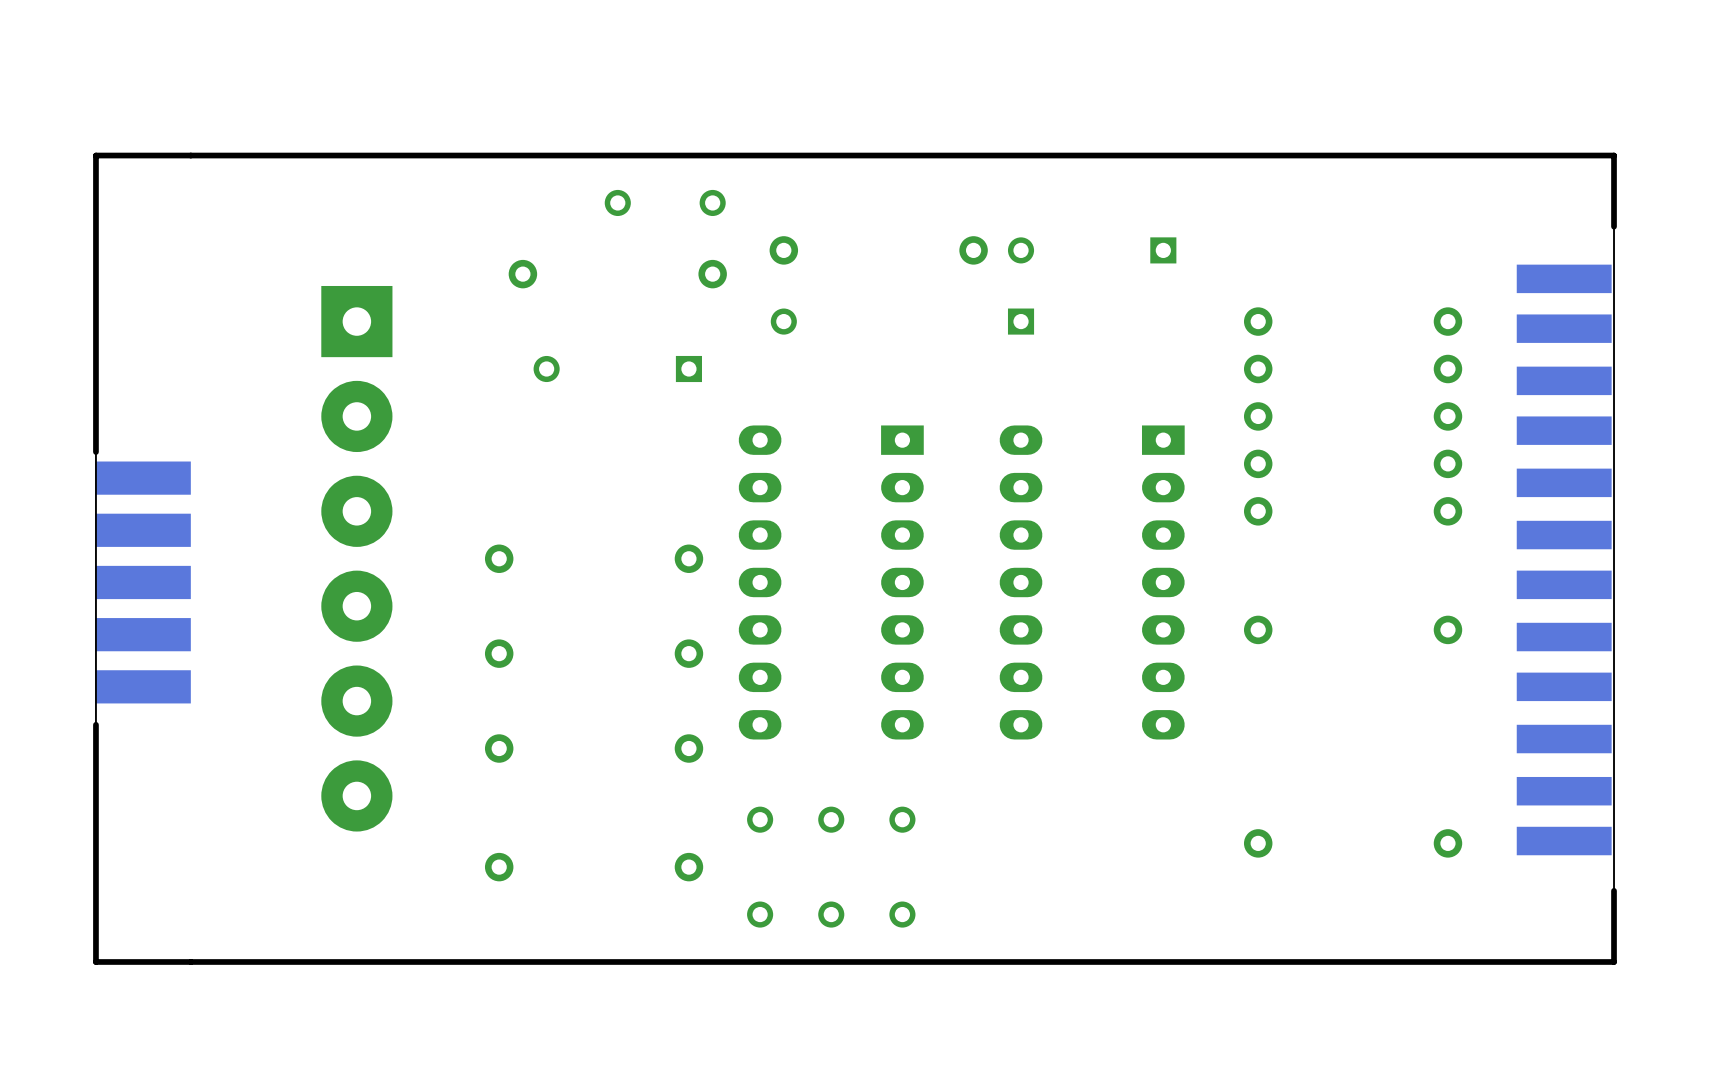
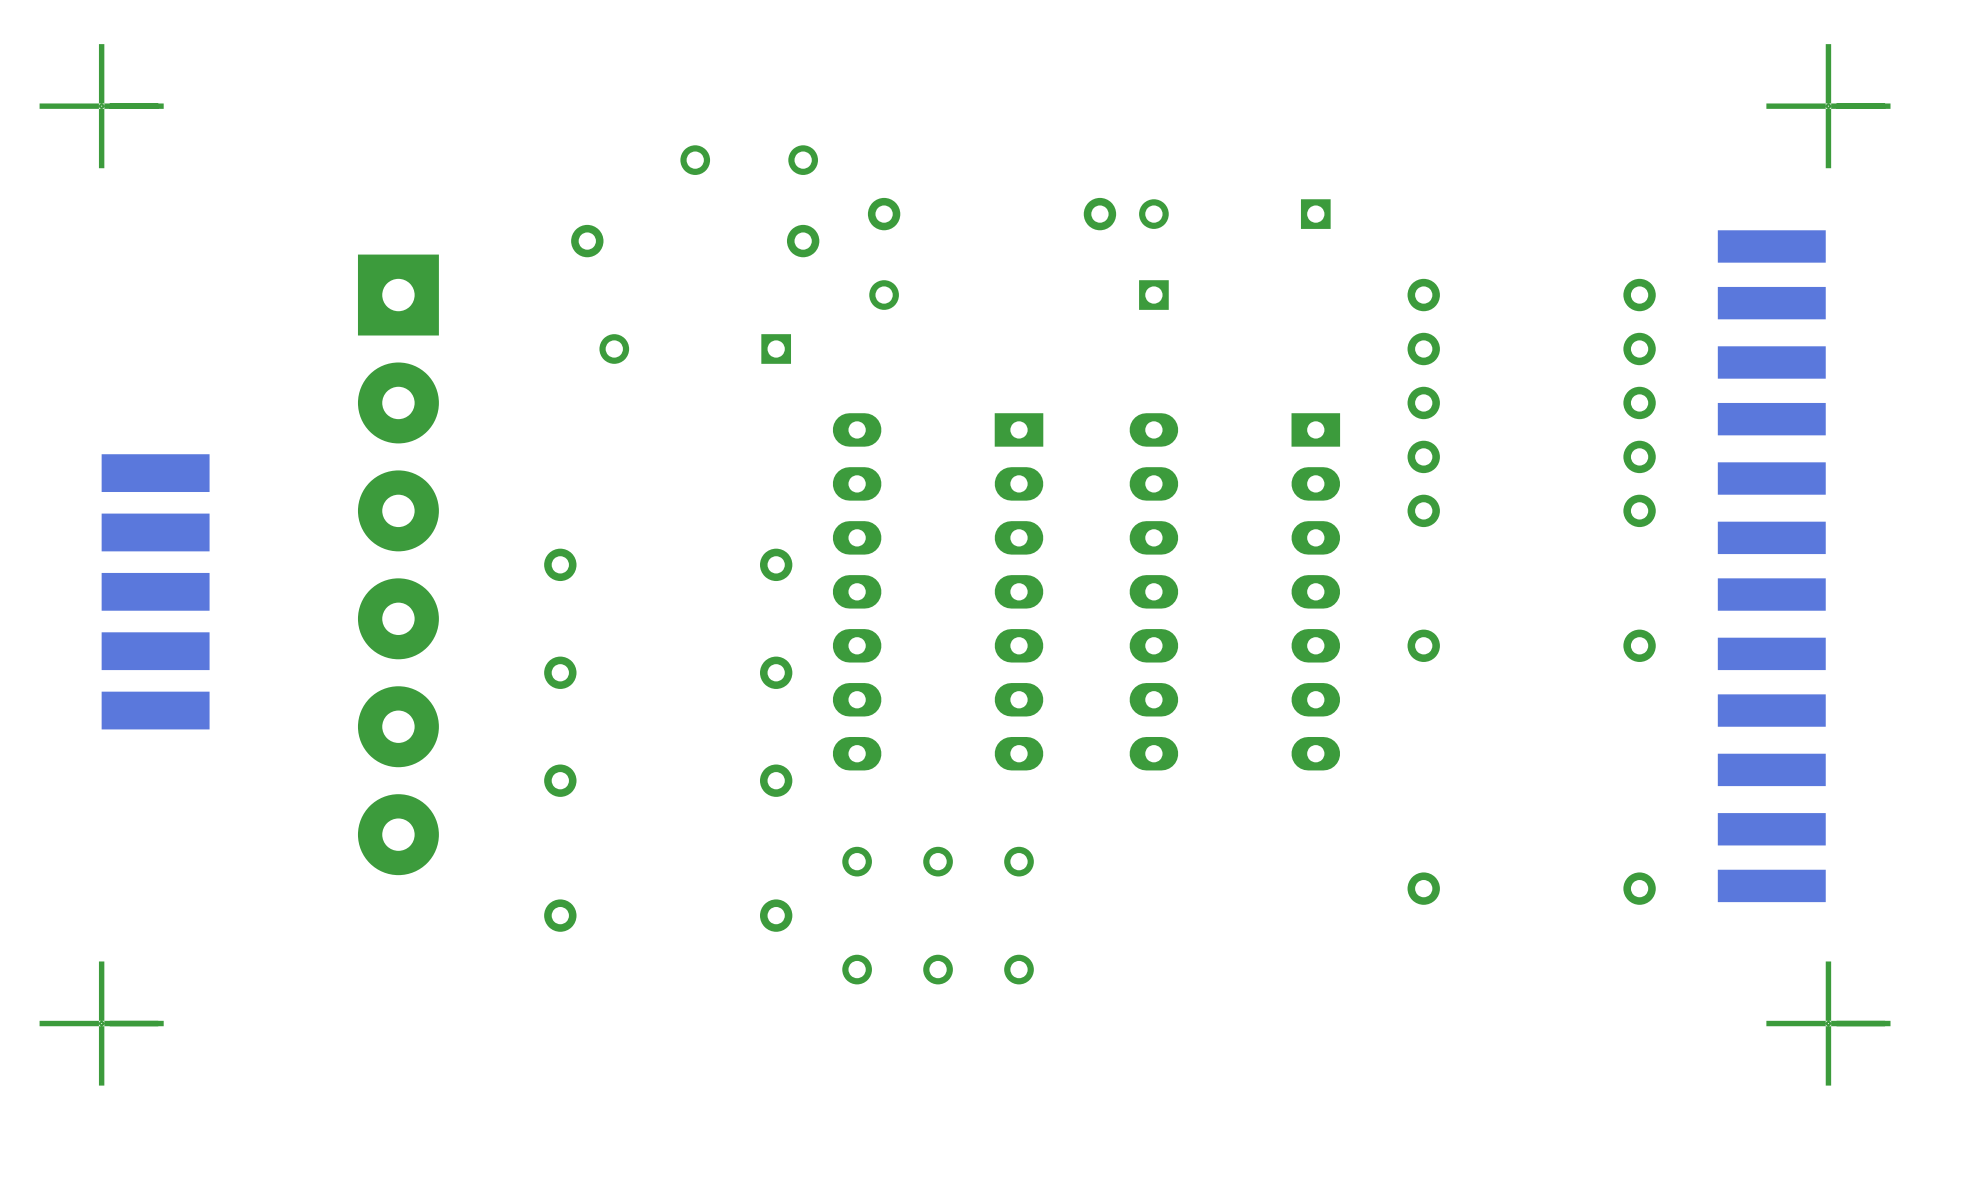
part: none -> (101, 106)
board edge: (1614, 155) (95, 155) (95, 961) (1614, 961) (1614, 155) -> none
part: none -> (1828, 106)
part: none -> (101, 1023)
part: none -> (1828, 1023)

